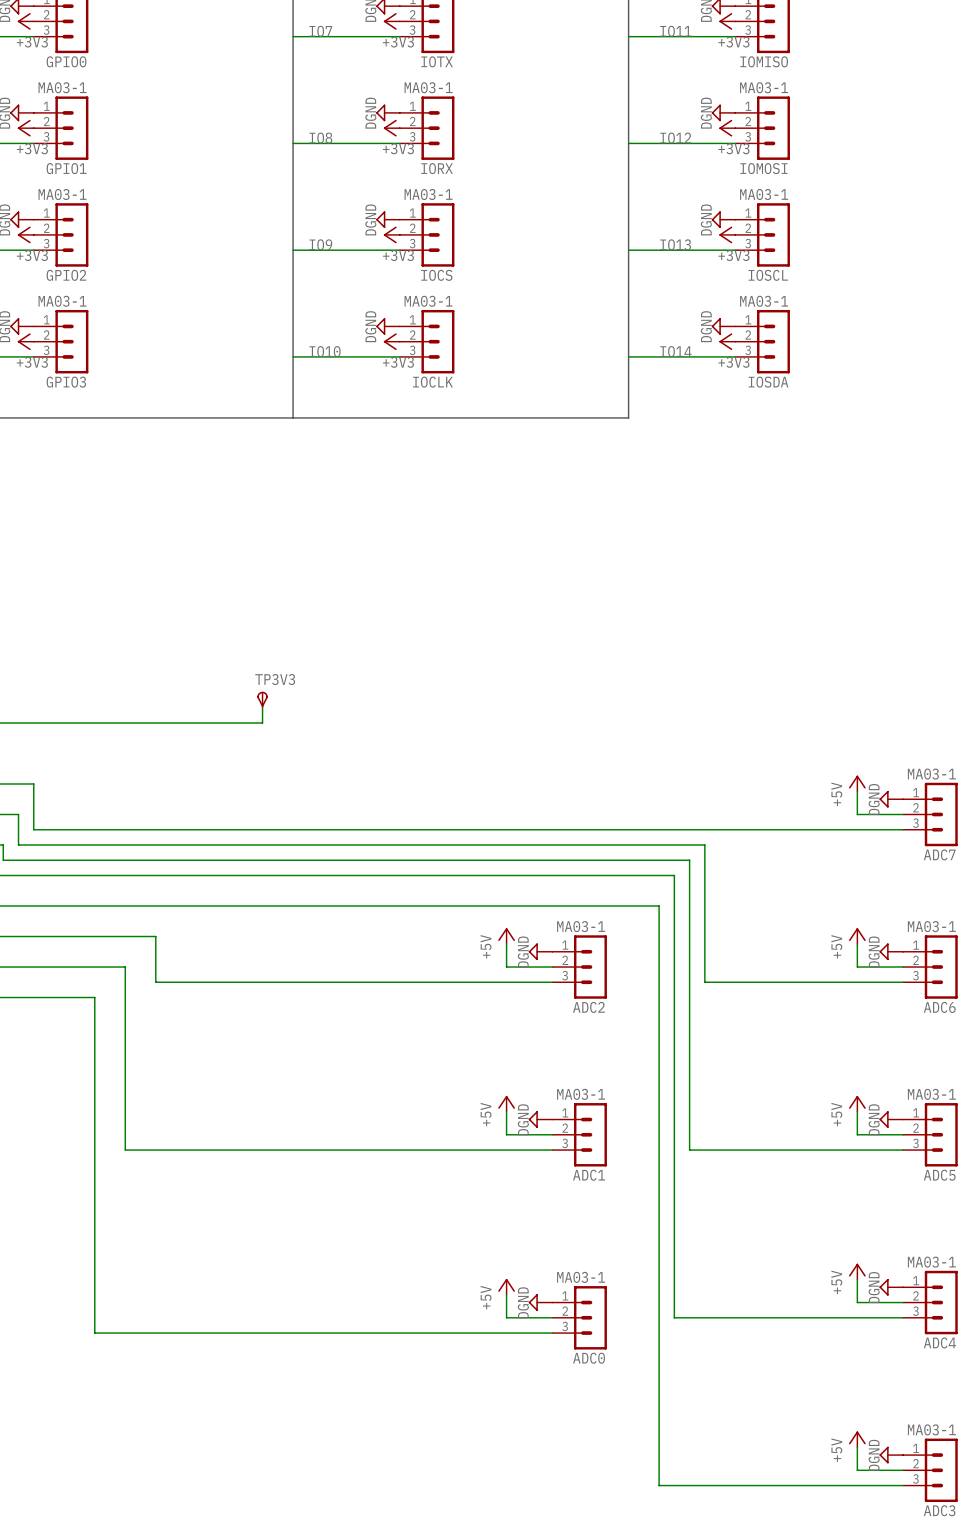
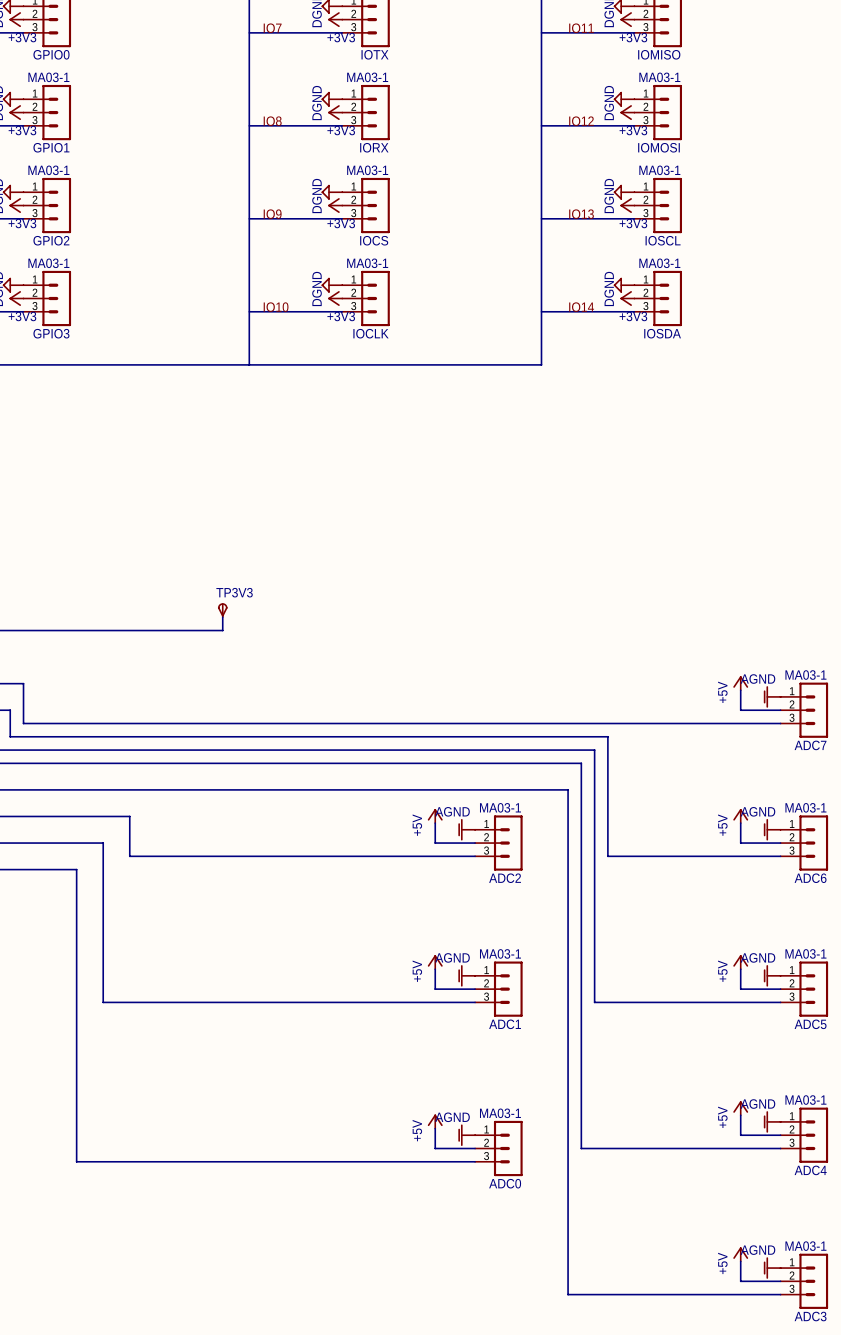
power symbol: DGND (891, 799) -> AGND (772, 696)
power symbol: DGND (540, 951) -> AGND (466, 829)
power symbol: DGND (891, 951) -> AGND (772, 829)
power symbol: DGND (540, 1119) -> AGND (466, 975)
power symbol: DGND (891, 1119) -> AGND (772, 975)
power symbol: DGND (891, 1287) -> AGND (772, 1121)
power symbol: DGND (540, 1302) -> AGND (466, 1135)
power symbol: DGND (891, 1455) -> AGND (772, 1268)

